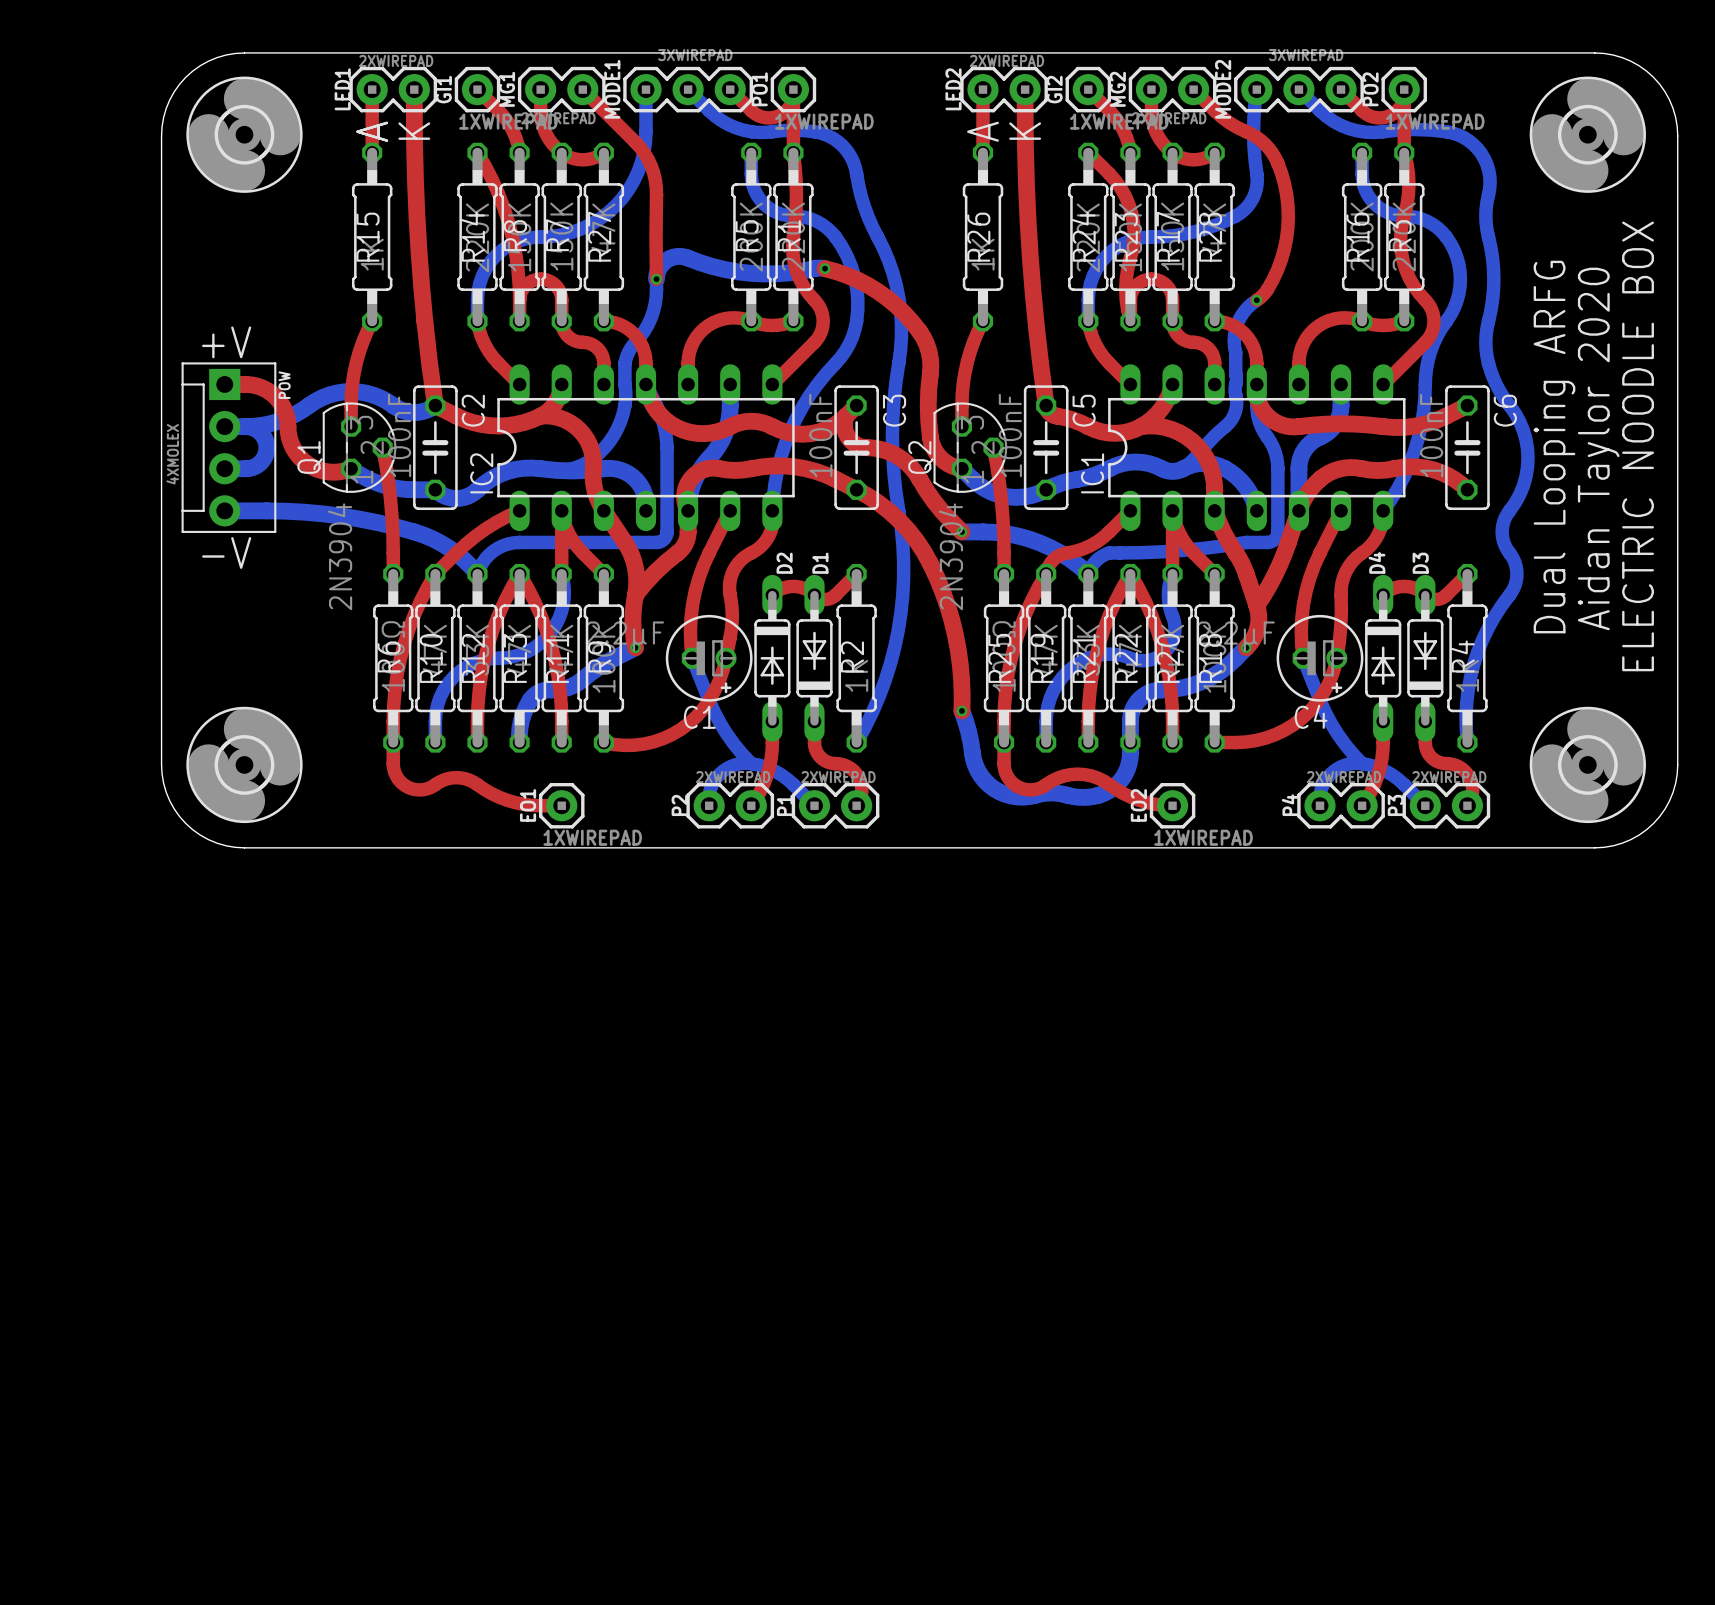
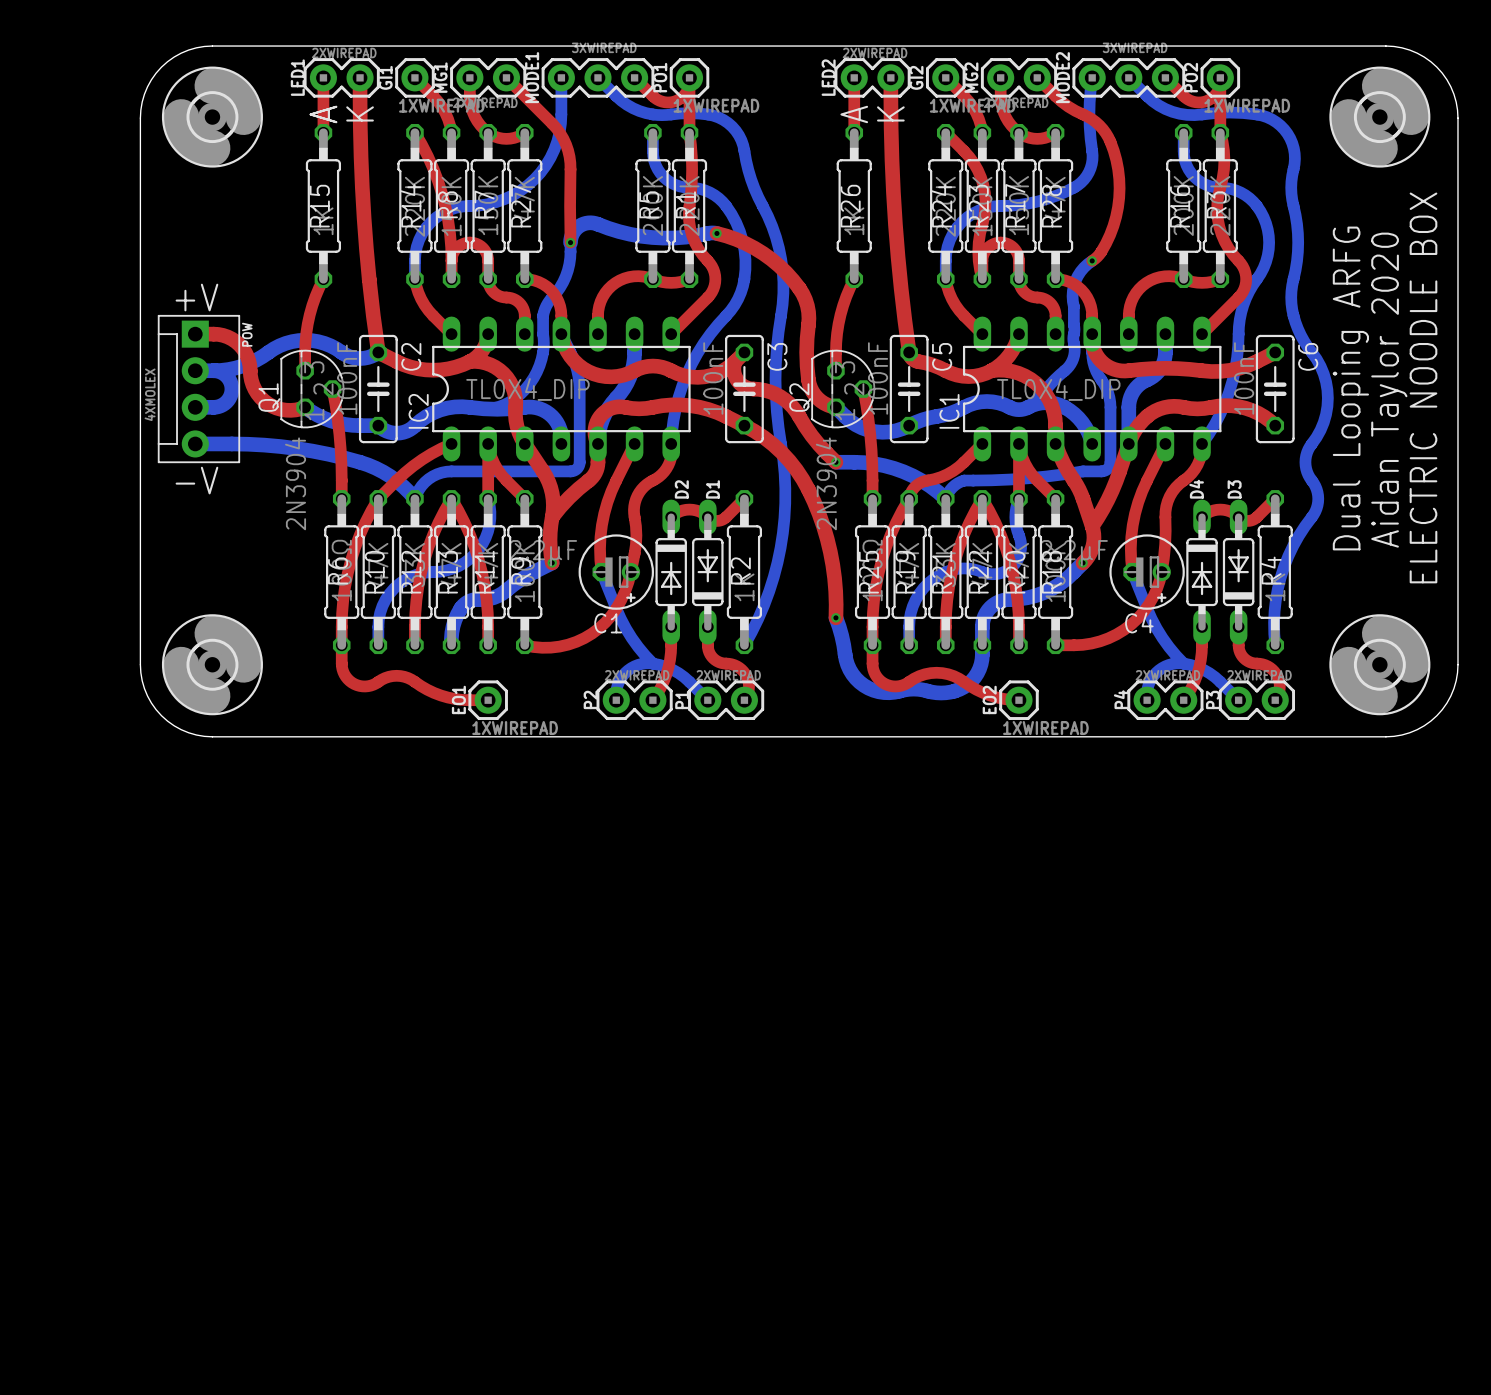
IC2 value: none -> TL0X4_DIP (527, 389)
IC1 value: none -> TL0X4_DIP (1058, 389)

